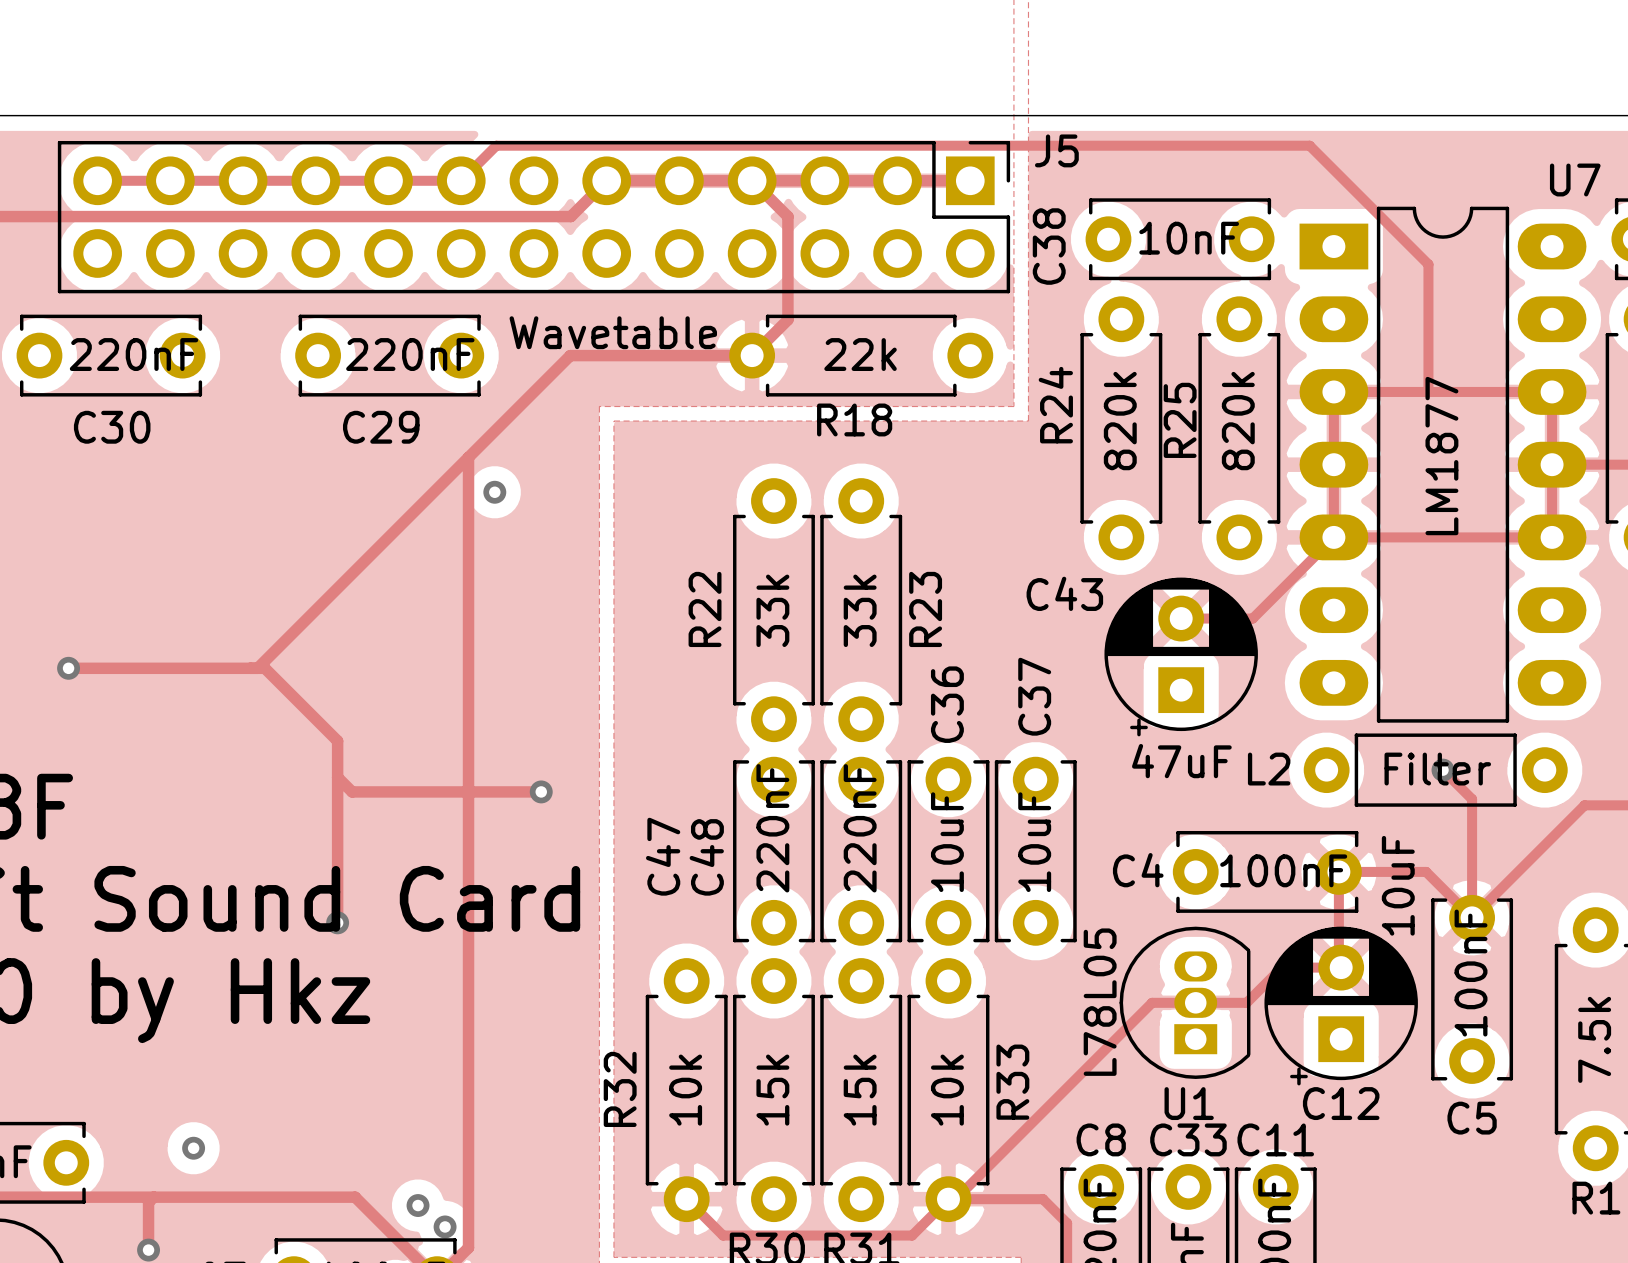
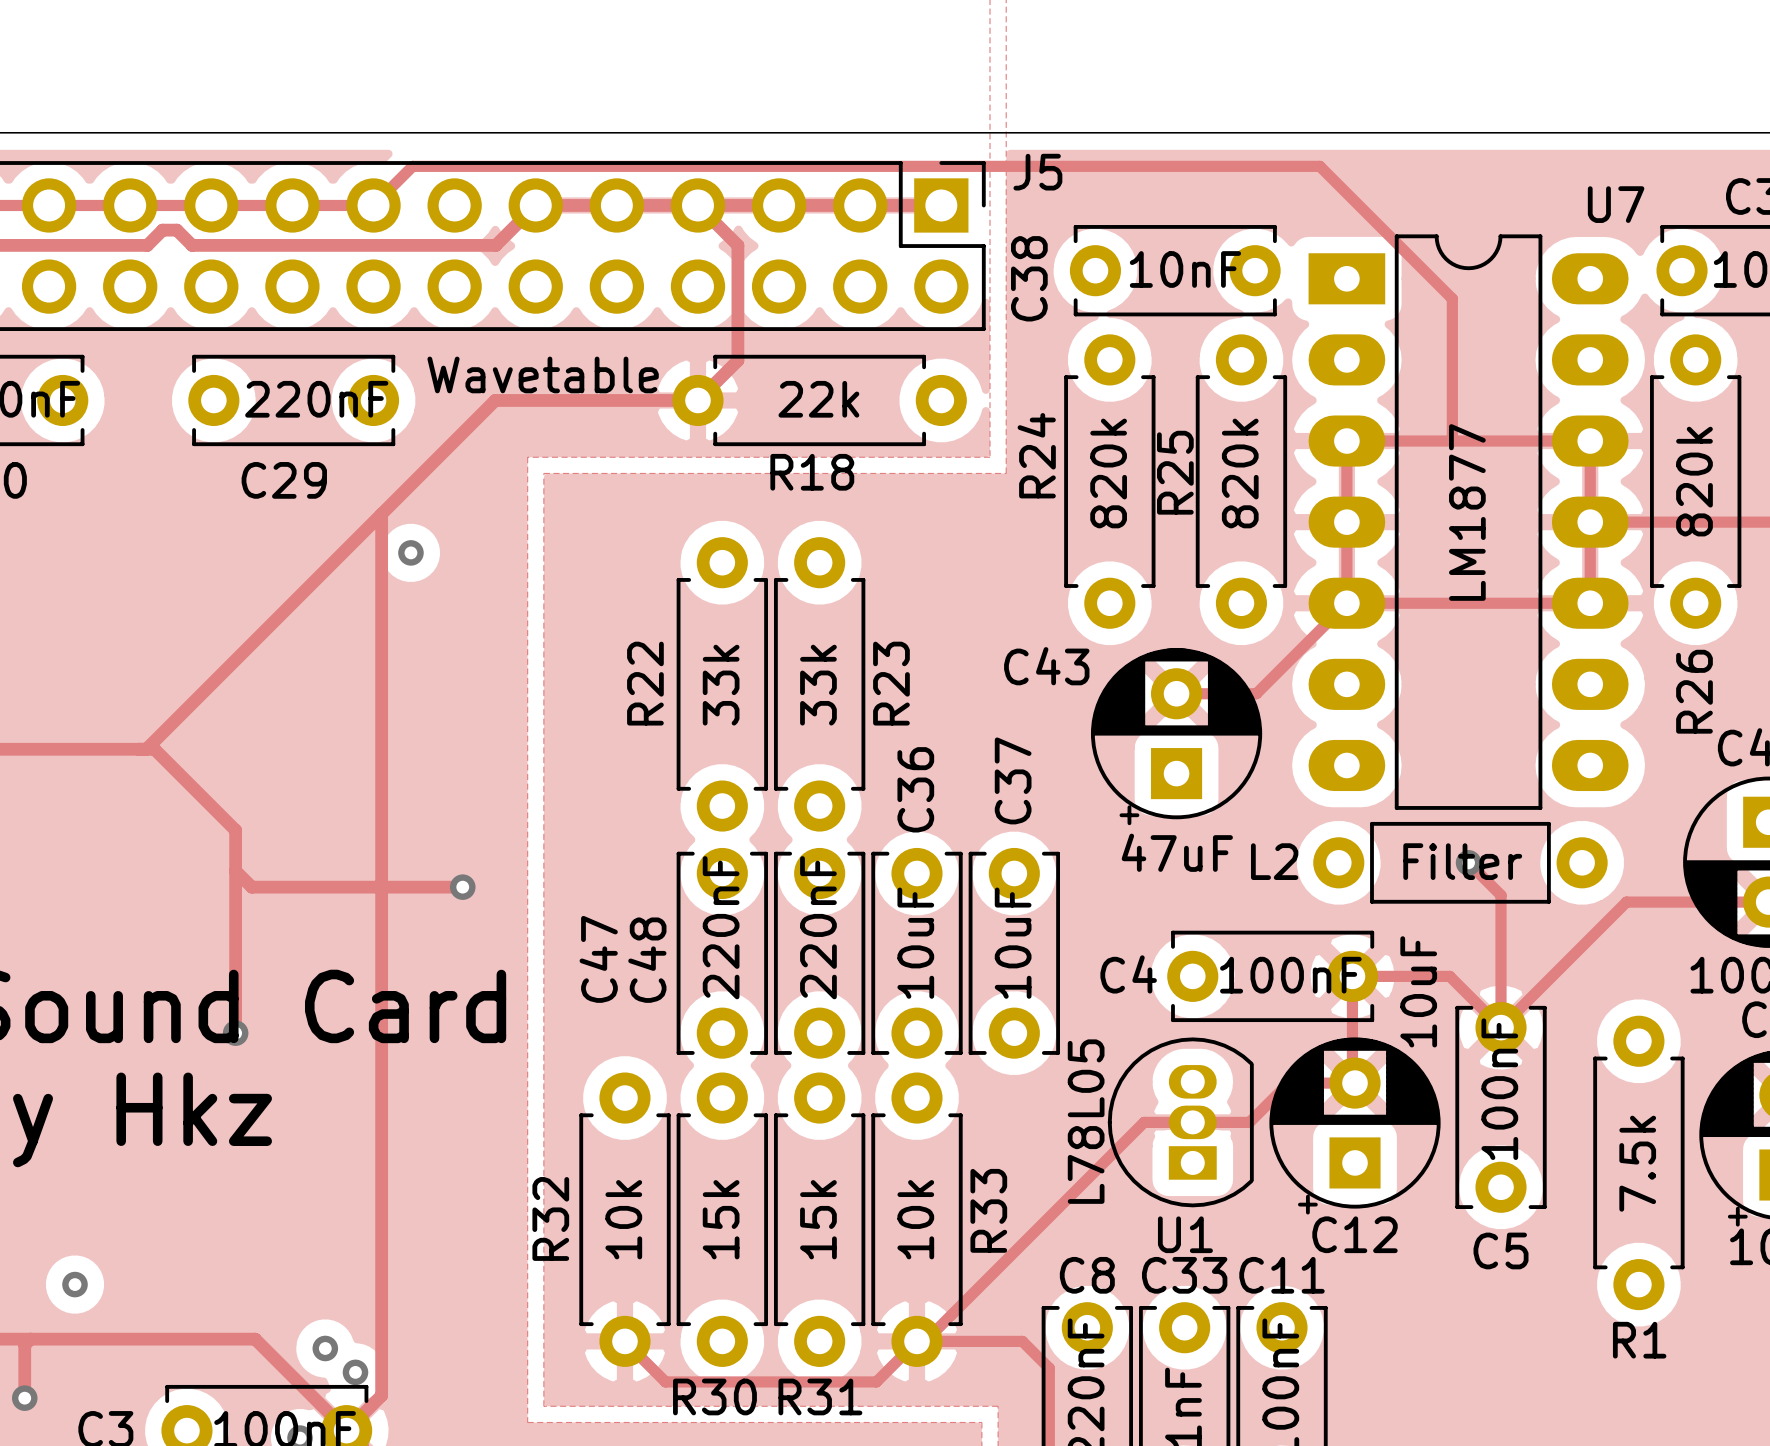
track: (258, 216) (298, 216) -> (147, 245) (162, 230) (176, 230) (192, 245)

